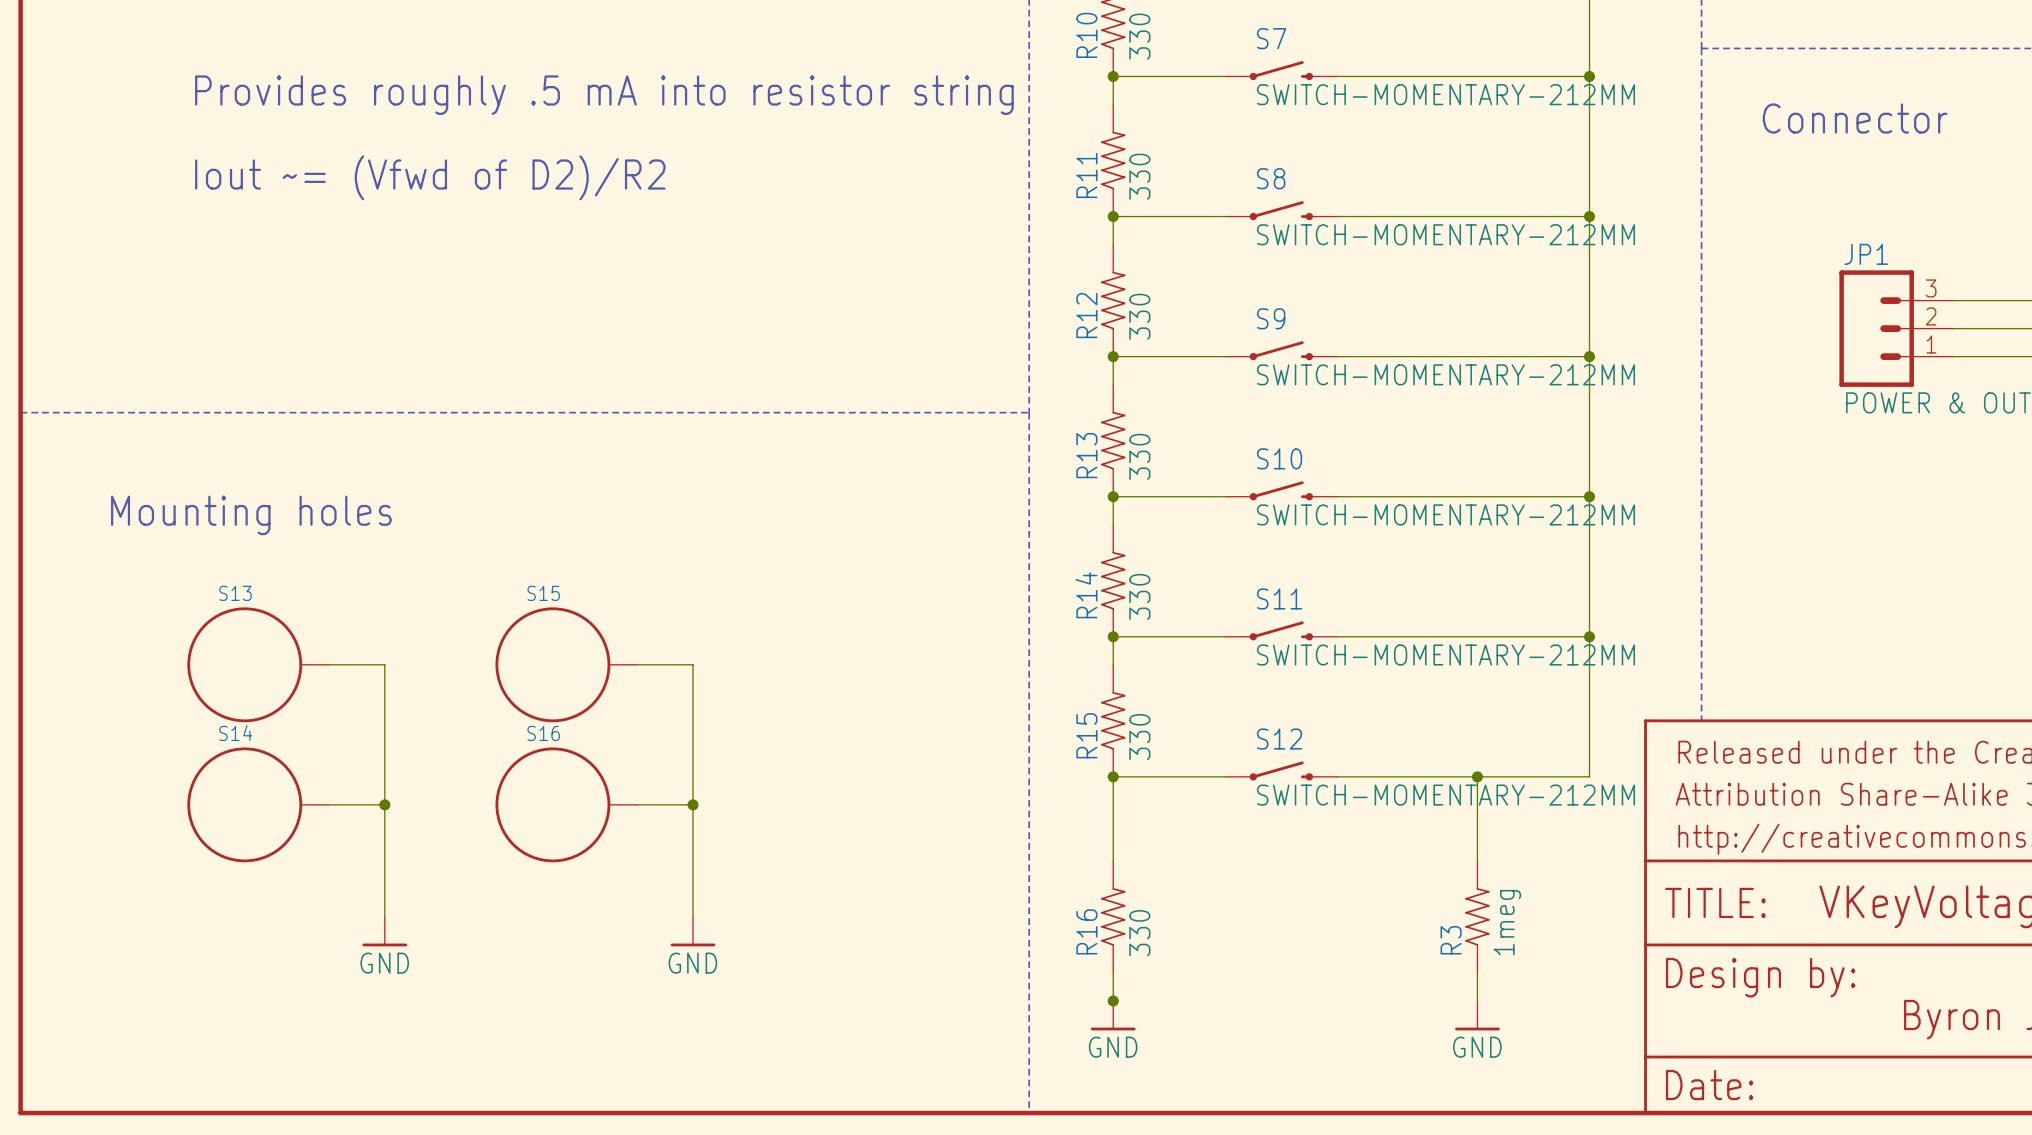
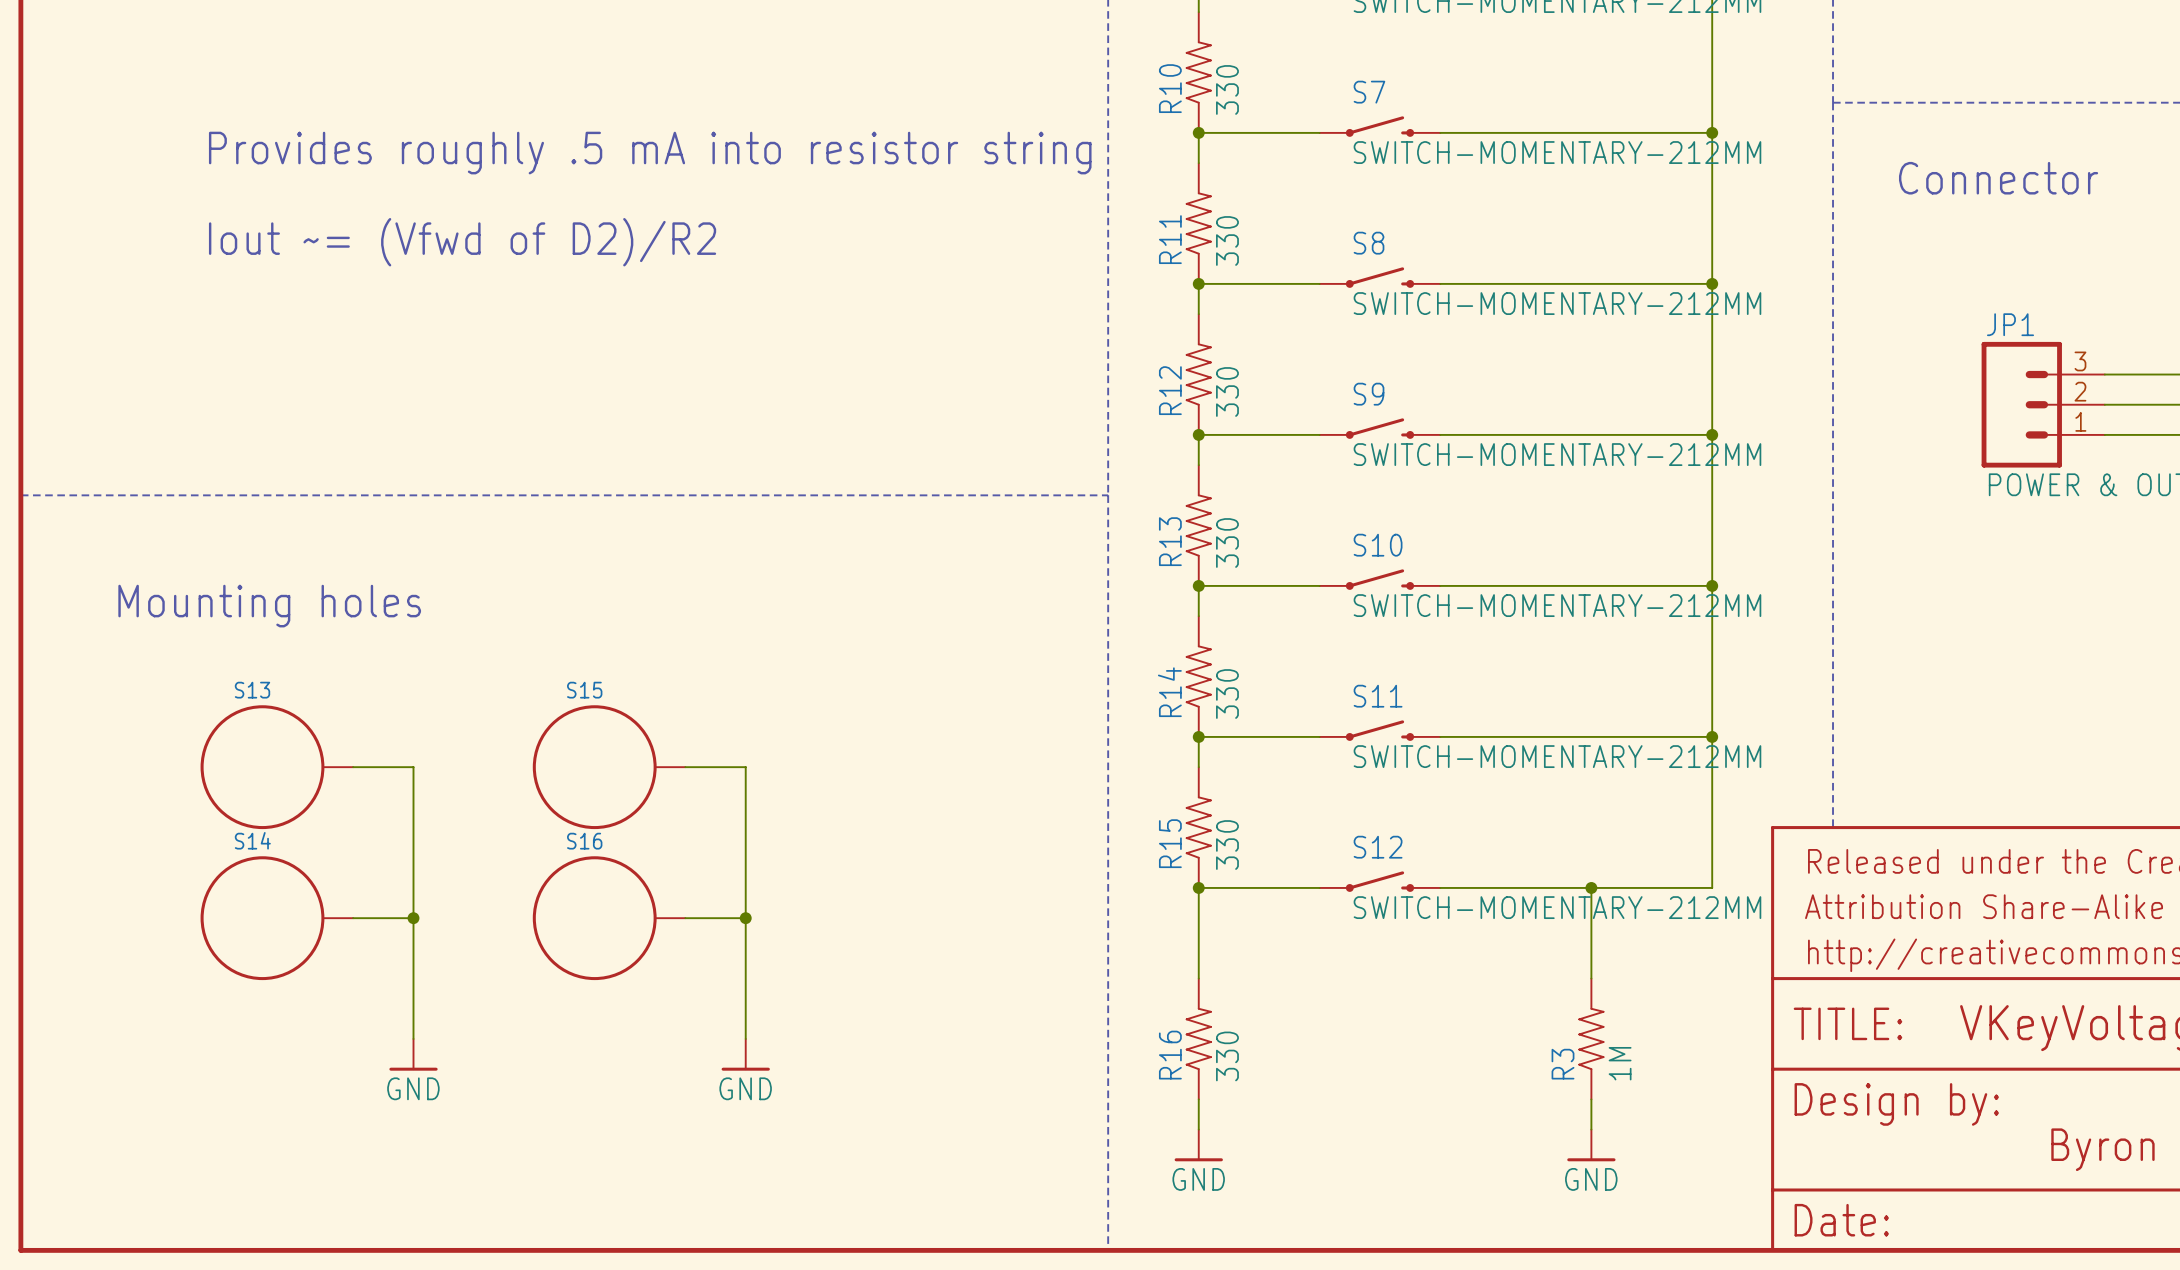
R3 value: 1meg (1507, 922) -> 1M (1620, 1063)
junction: (1113, 1000) -> none

